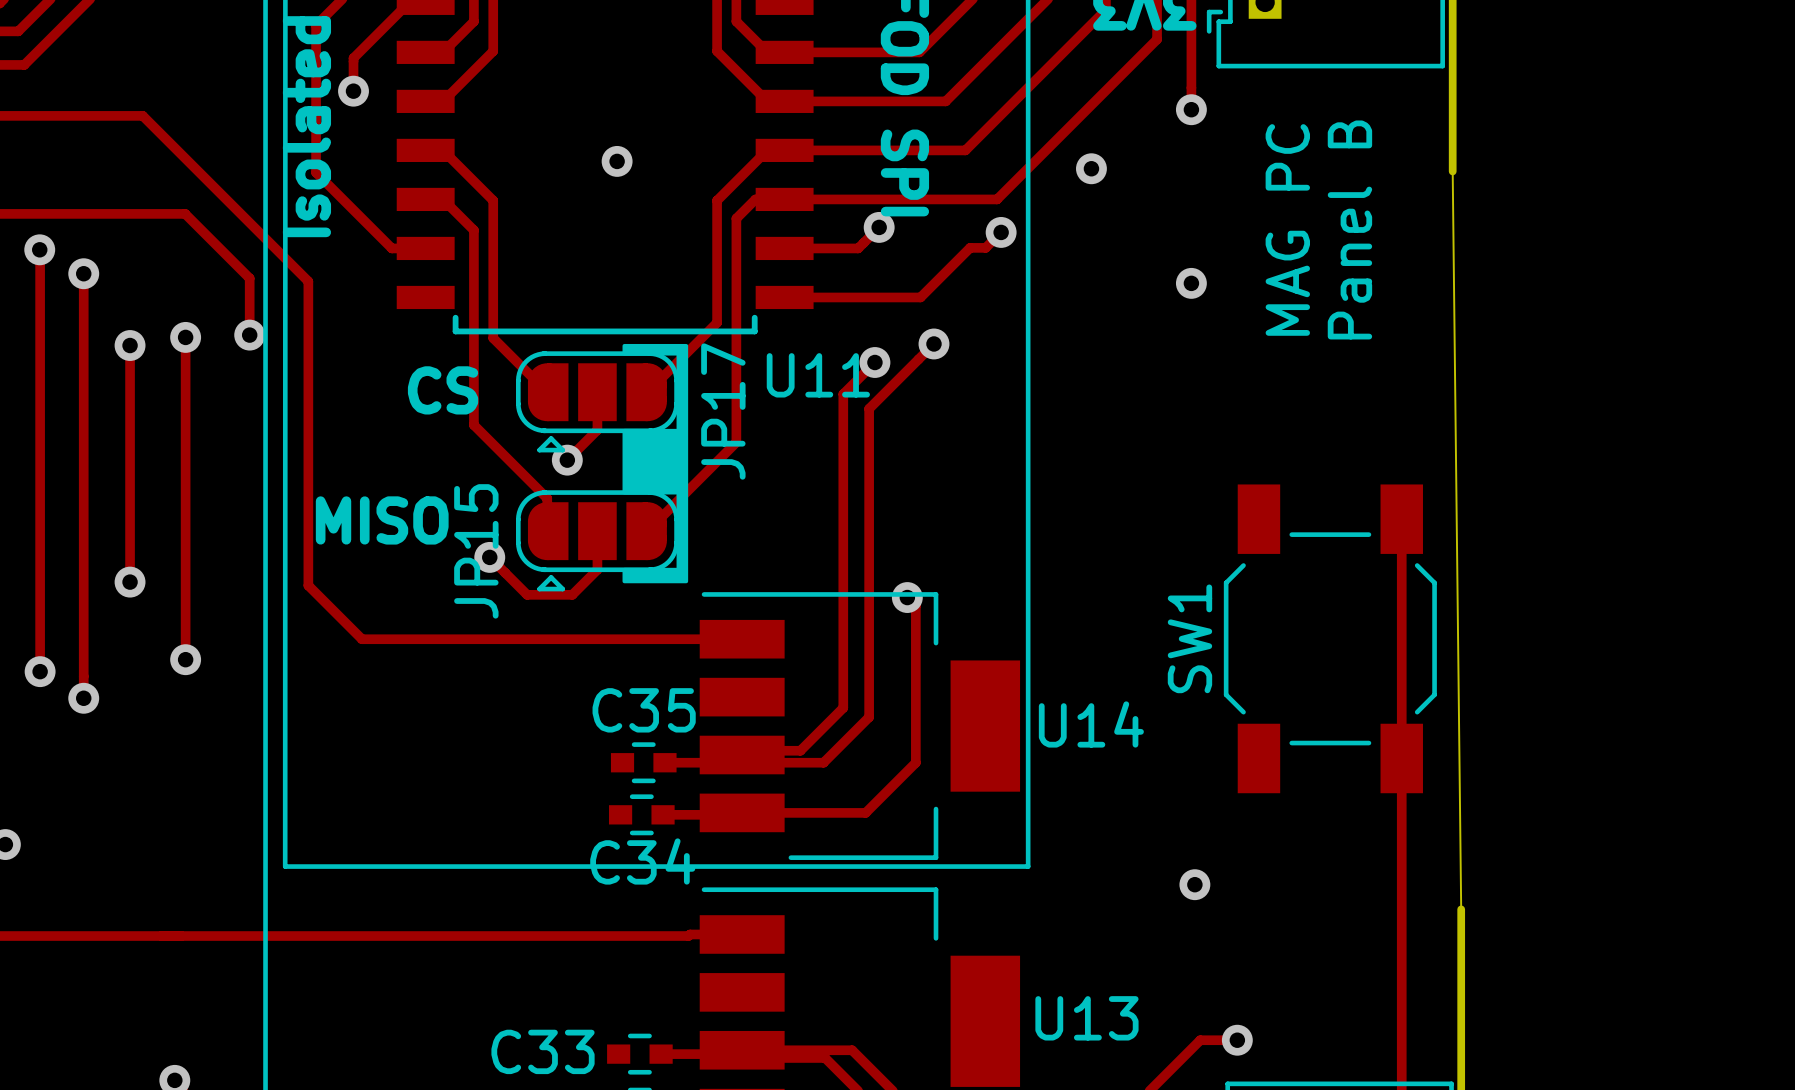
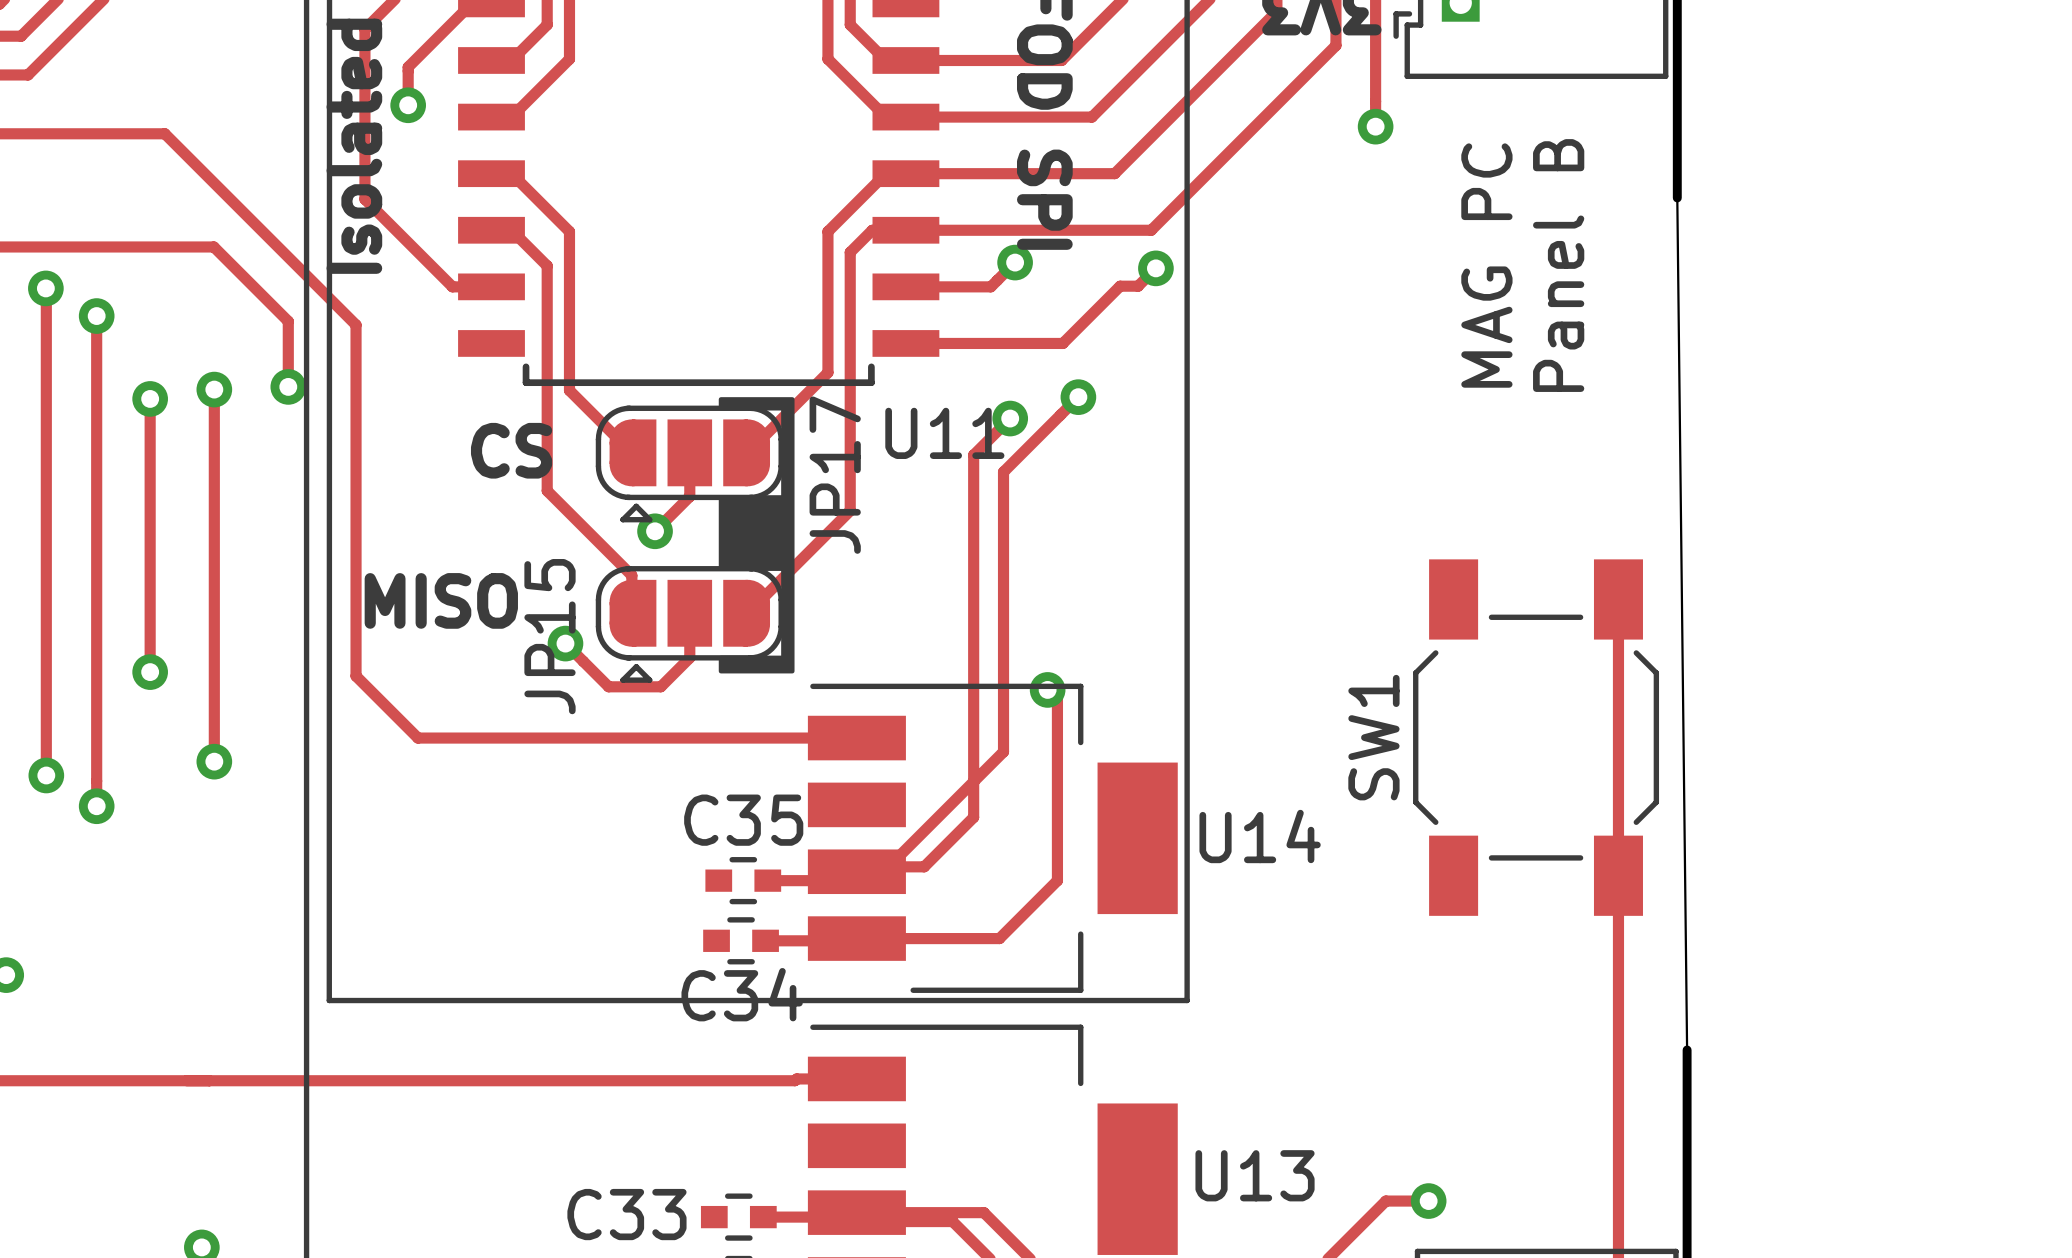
via: (617, 161) -> none
via: (1091, 168) -> none
via: (1191, 283) -> none
track: (869, 651) (869, 717) (823, 762) (749, 762) (742, 755) -> (1003, 751) (883, 871) (856, 871)
via: (1194, 884) -> none

